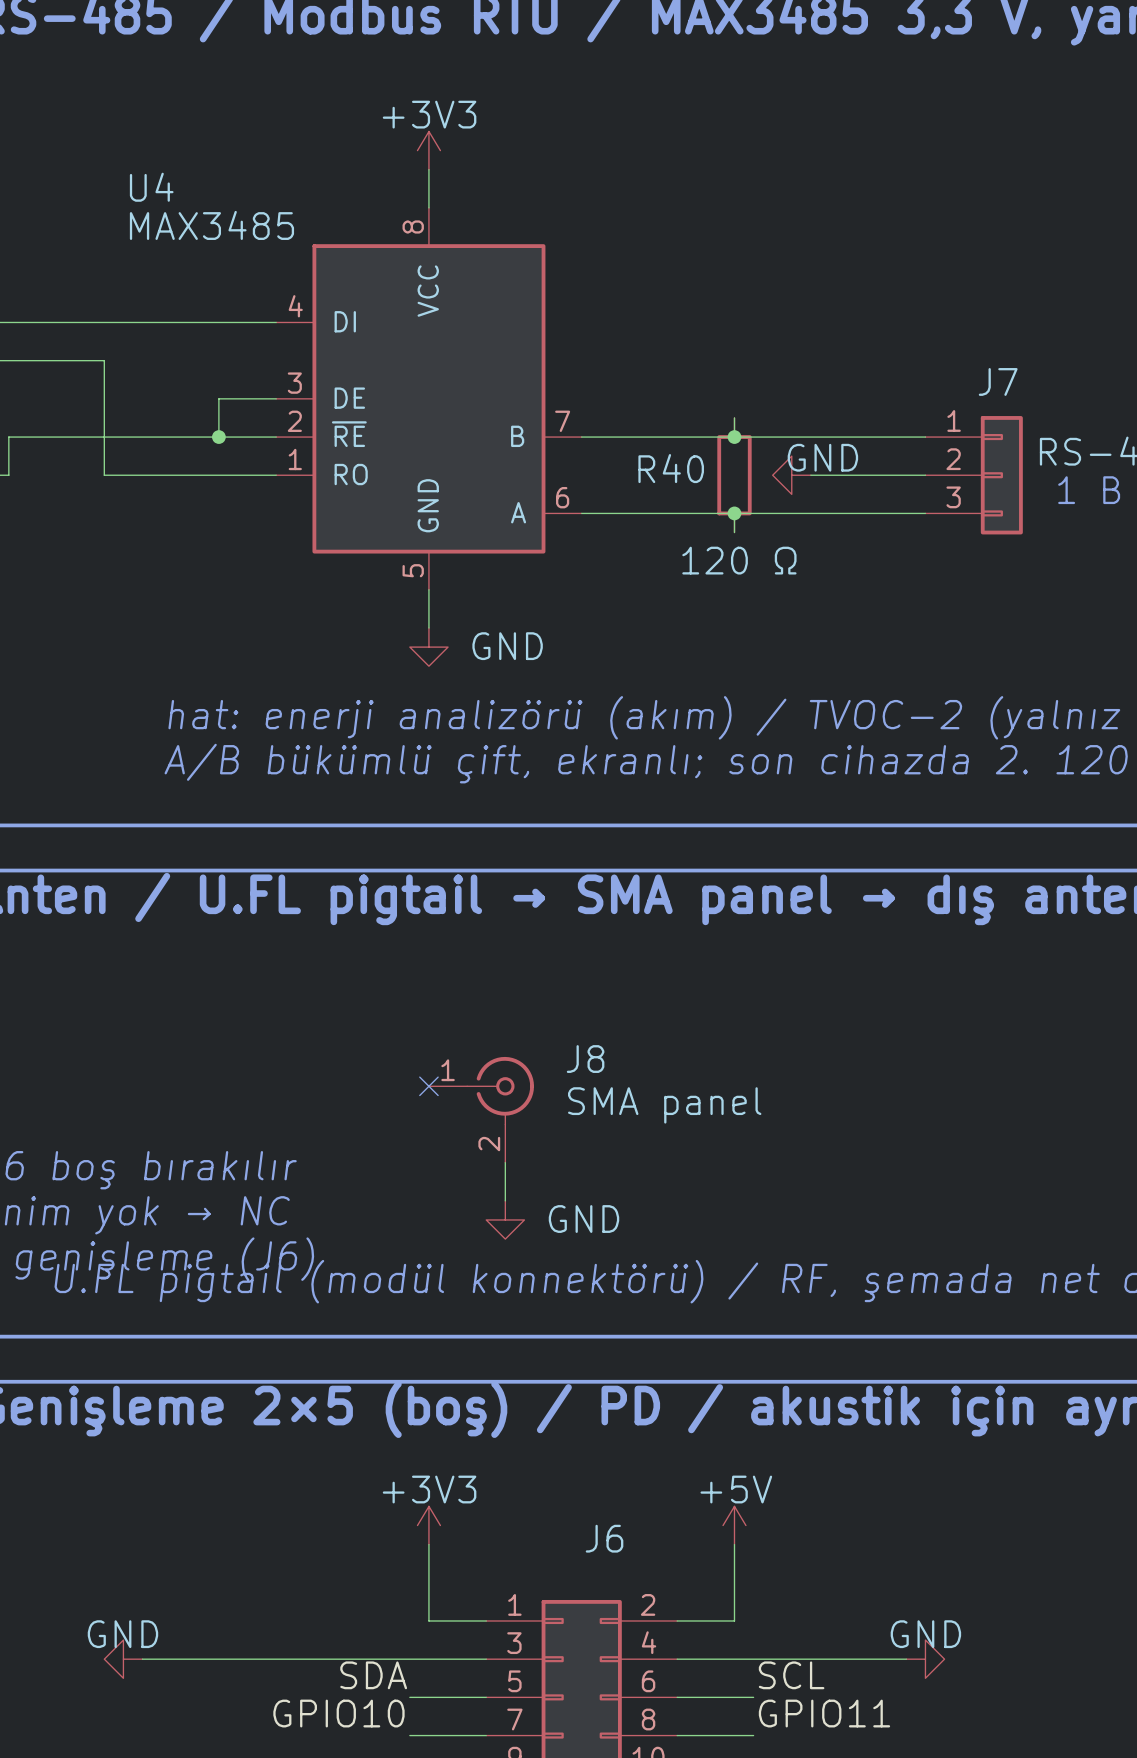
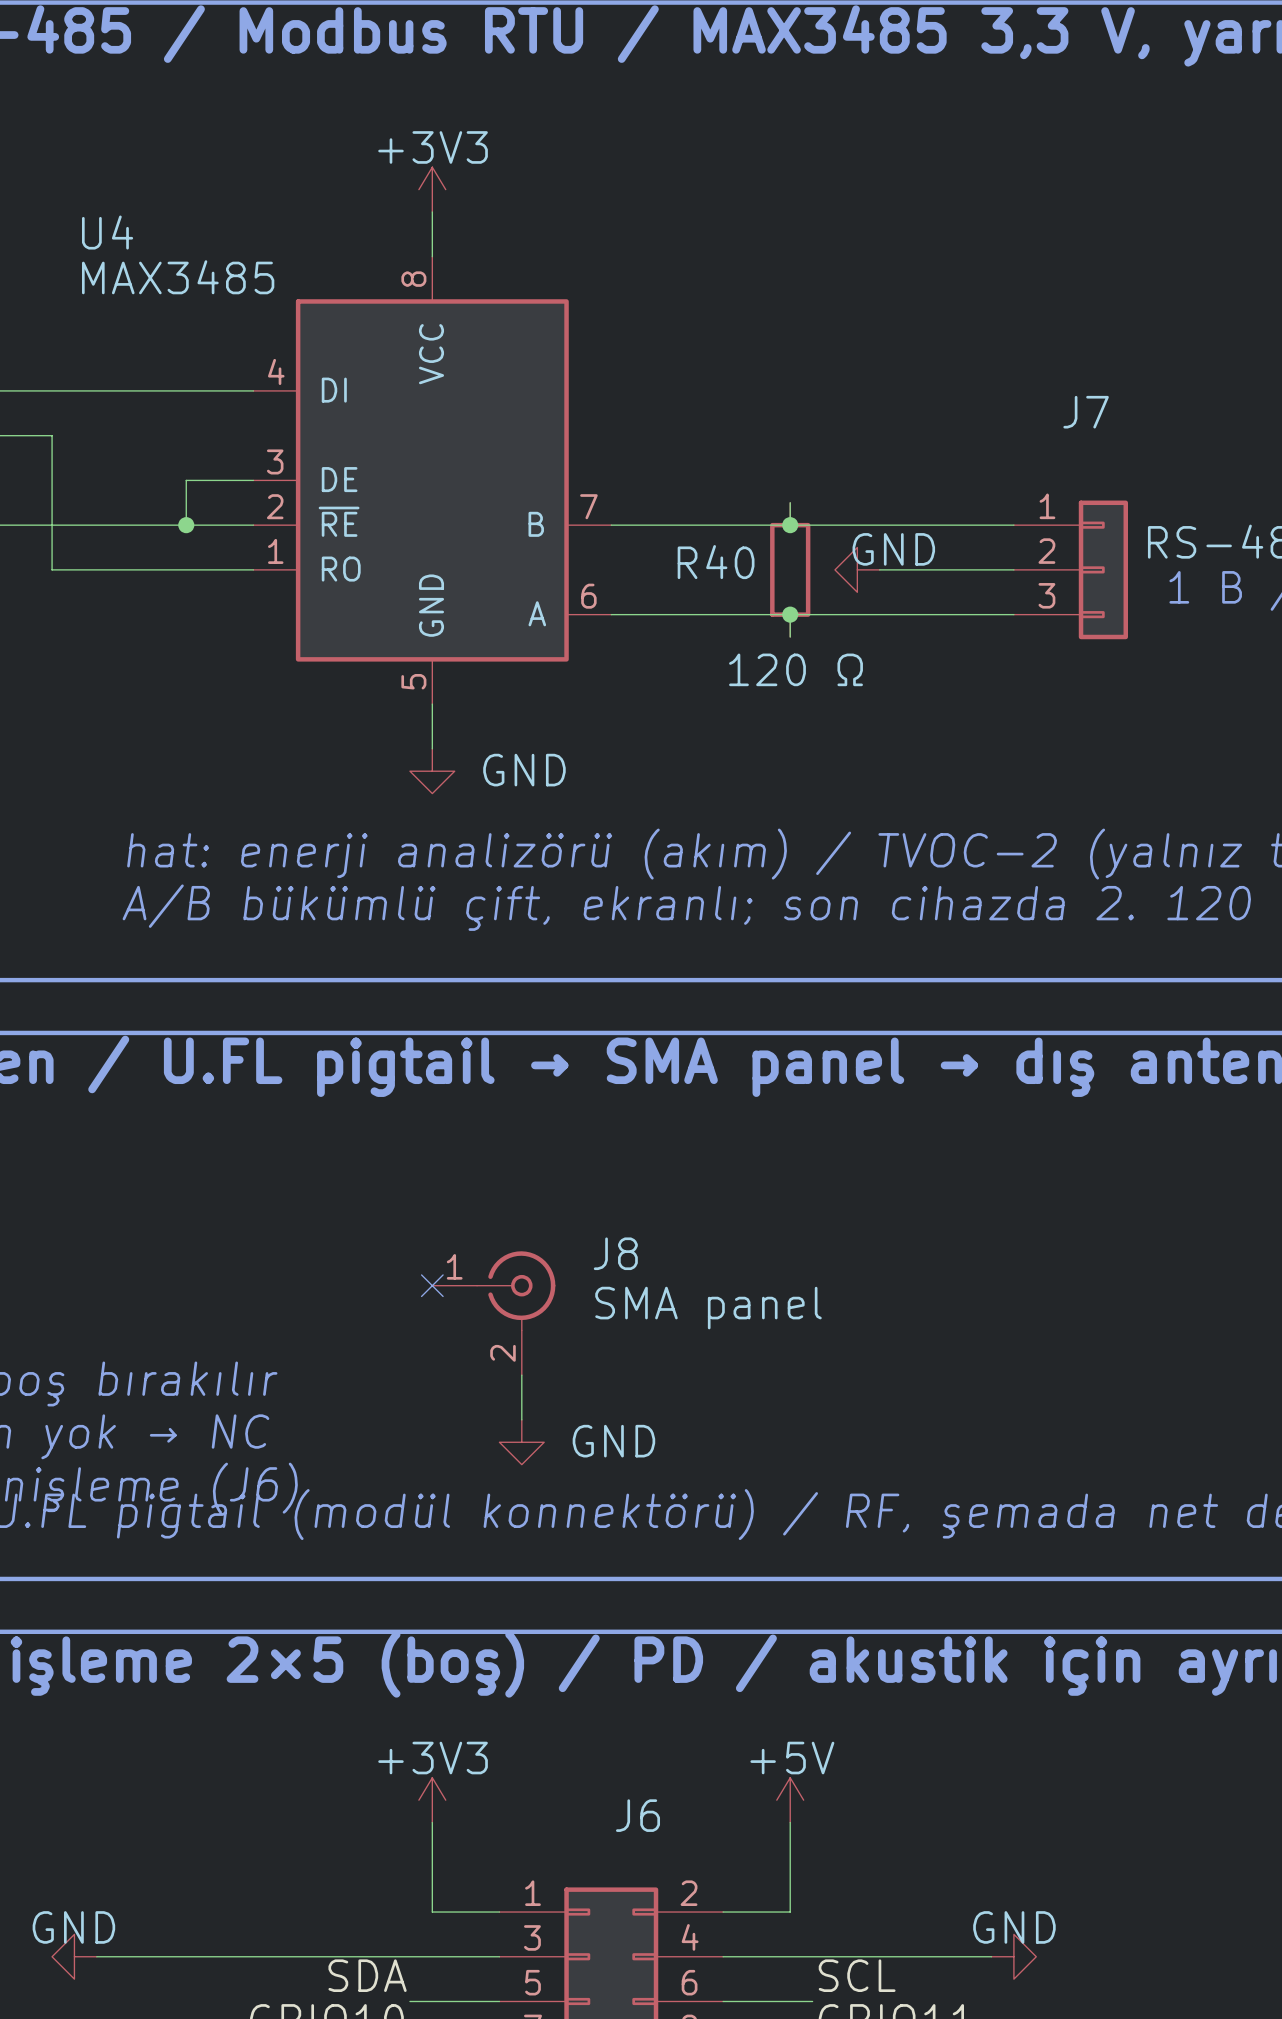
J7 name position: J7 (998, 381) -> J7 (1086, 412)

